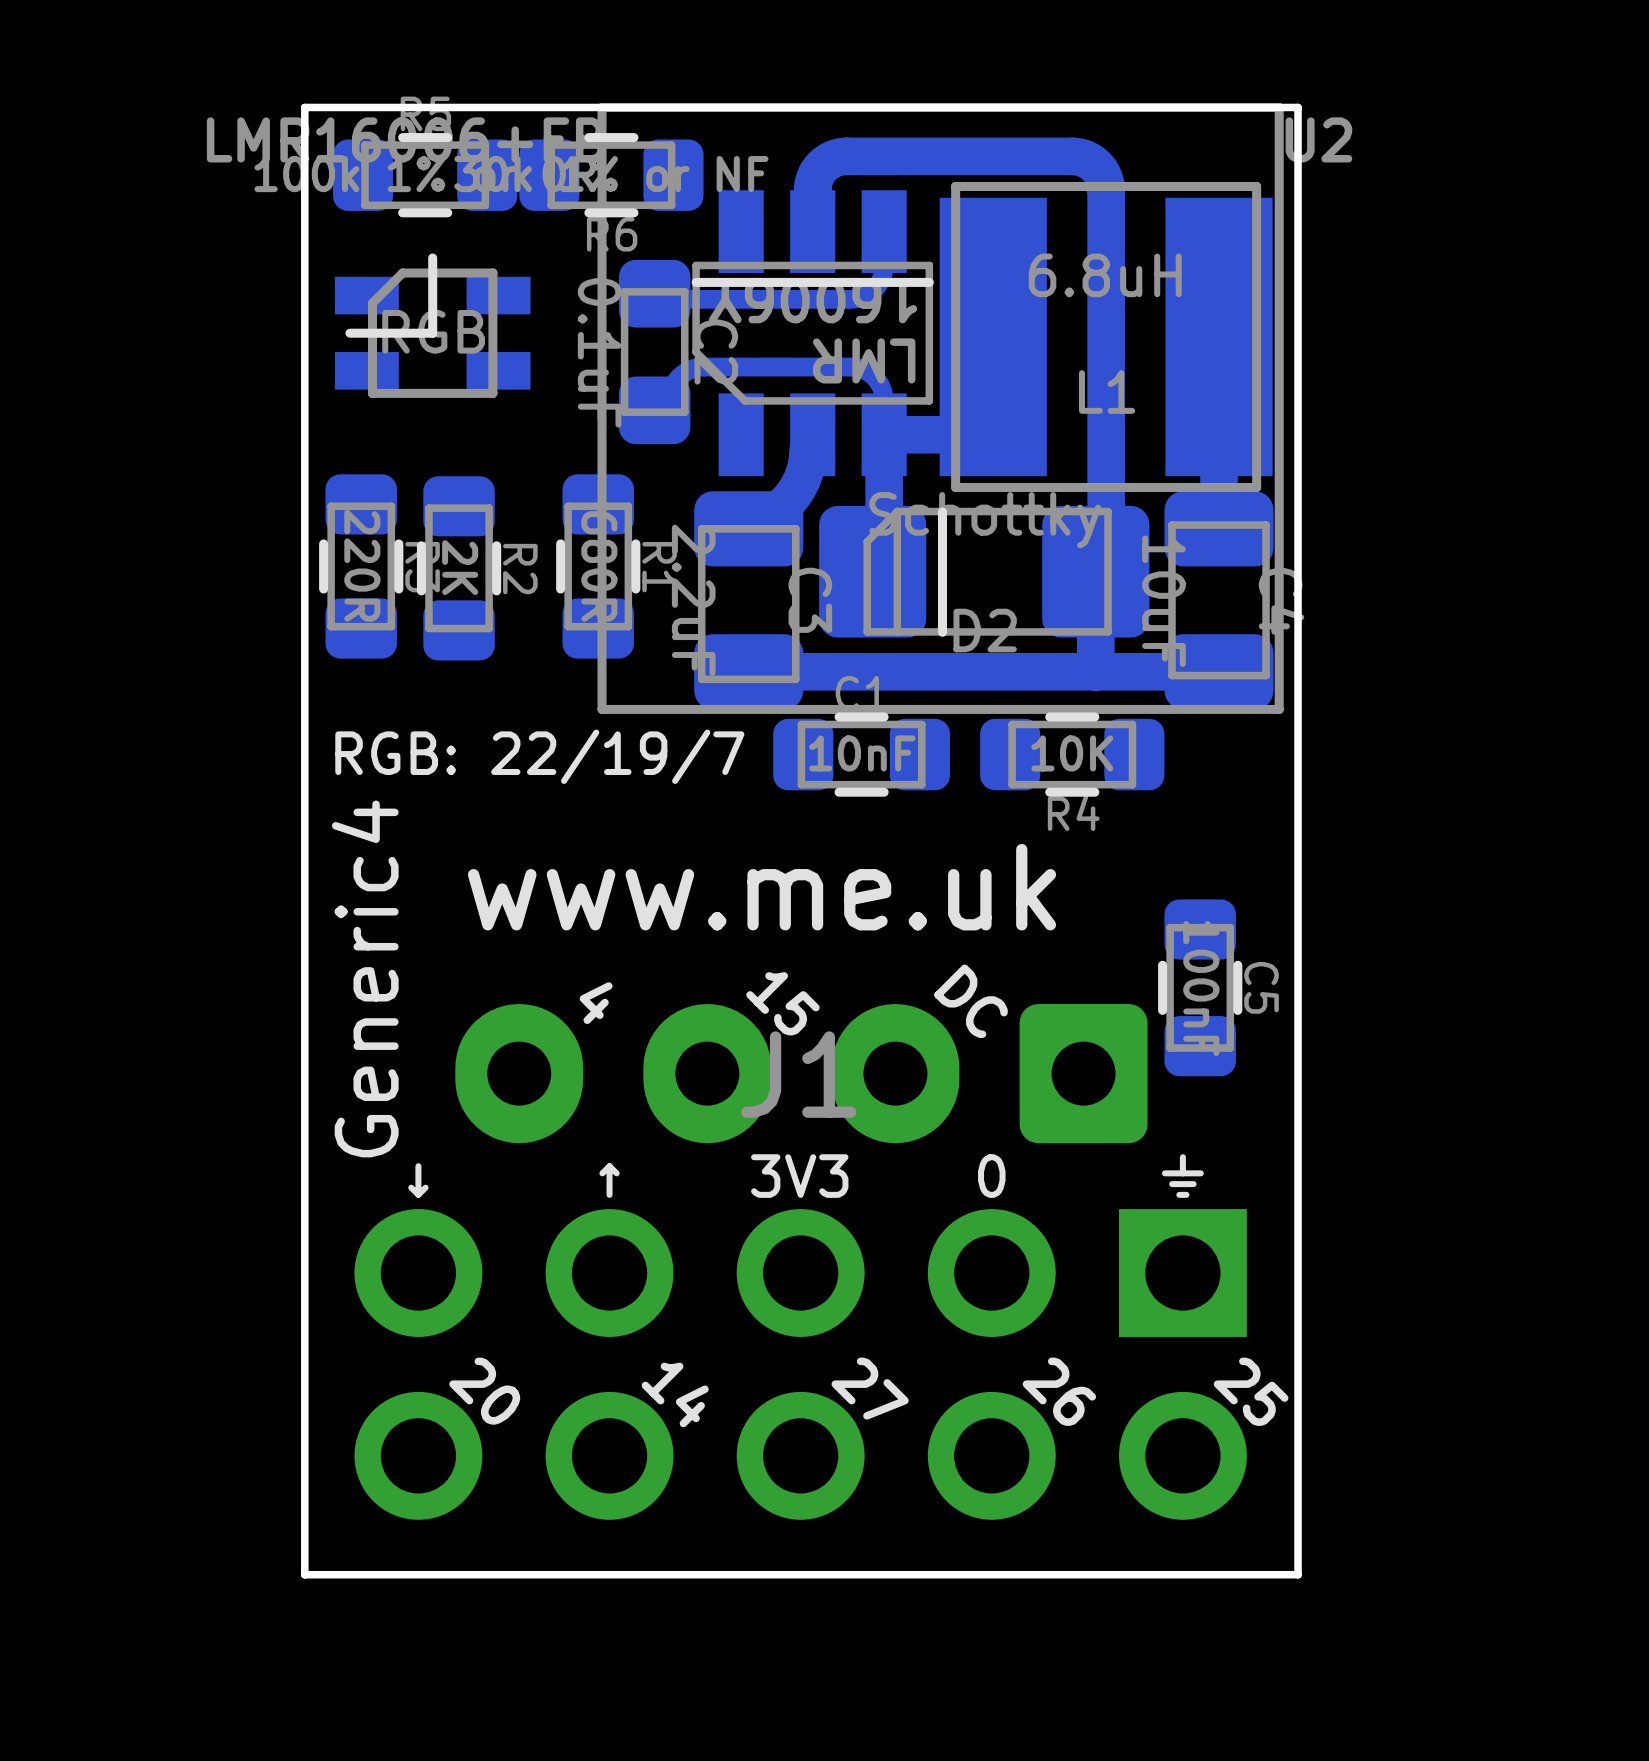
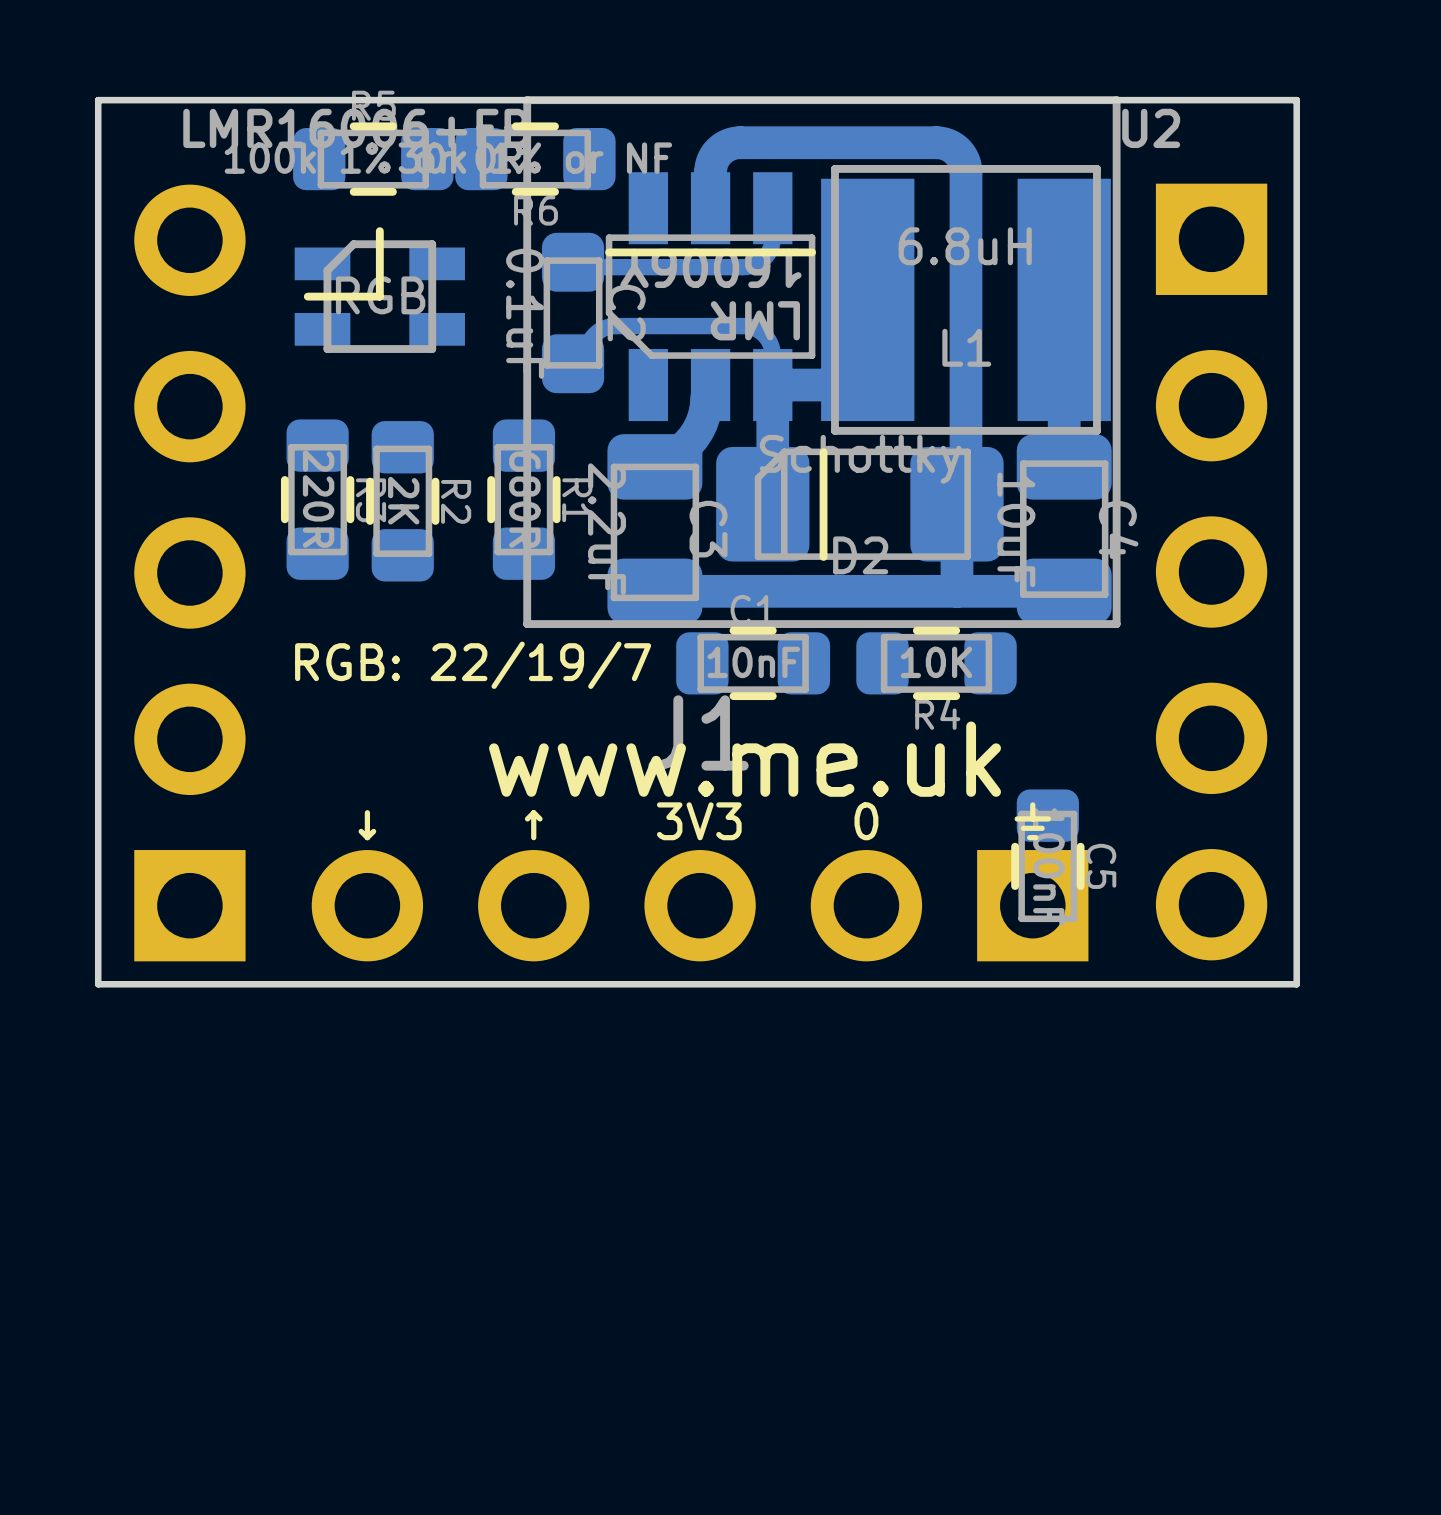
board edge: (1298, 107) (1298, 1574) (304, 1574) (304, 107) -> (1132, 100) (1296, 100) (1296, 984) (98, 984) (98, 100) (268, 100)
part: none -> (1211, 572)
part: none -> (189, 572)
text position: www.me.uk (761, 887) -> www.me.uk (745, 759)
text: Generic4 (365, 978) -> none
text: DC (971, 1001) -> none
text: 4 (596, 1003) -> none
text: 15 (782, 1003) -> none
part: (801, 1073) -> none
J1 position: (800, 1273) -> (700, 905)
text: 27 (870, 1388) -> none
text: 20 (484, 1391) -> none
text: 26 (1059, 1391) -> none
text: 25 (1251, 1391) -> none
text: 14 (675, 1394) -> none
part: (800, 1455) -> none

